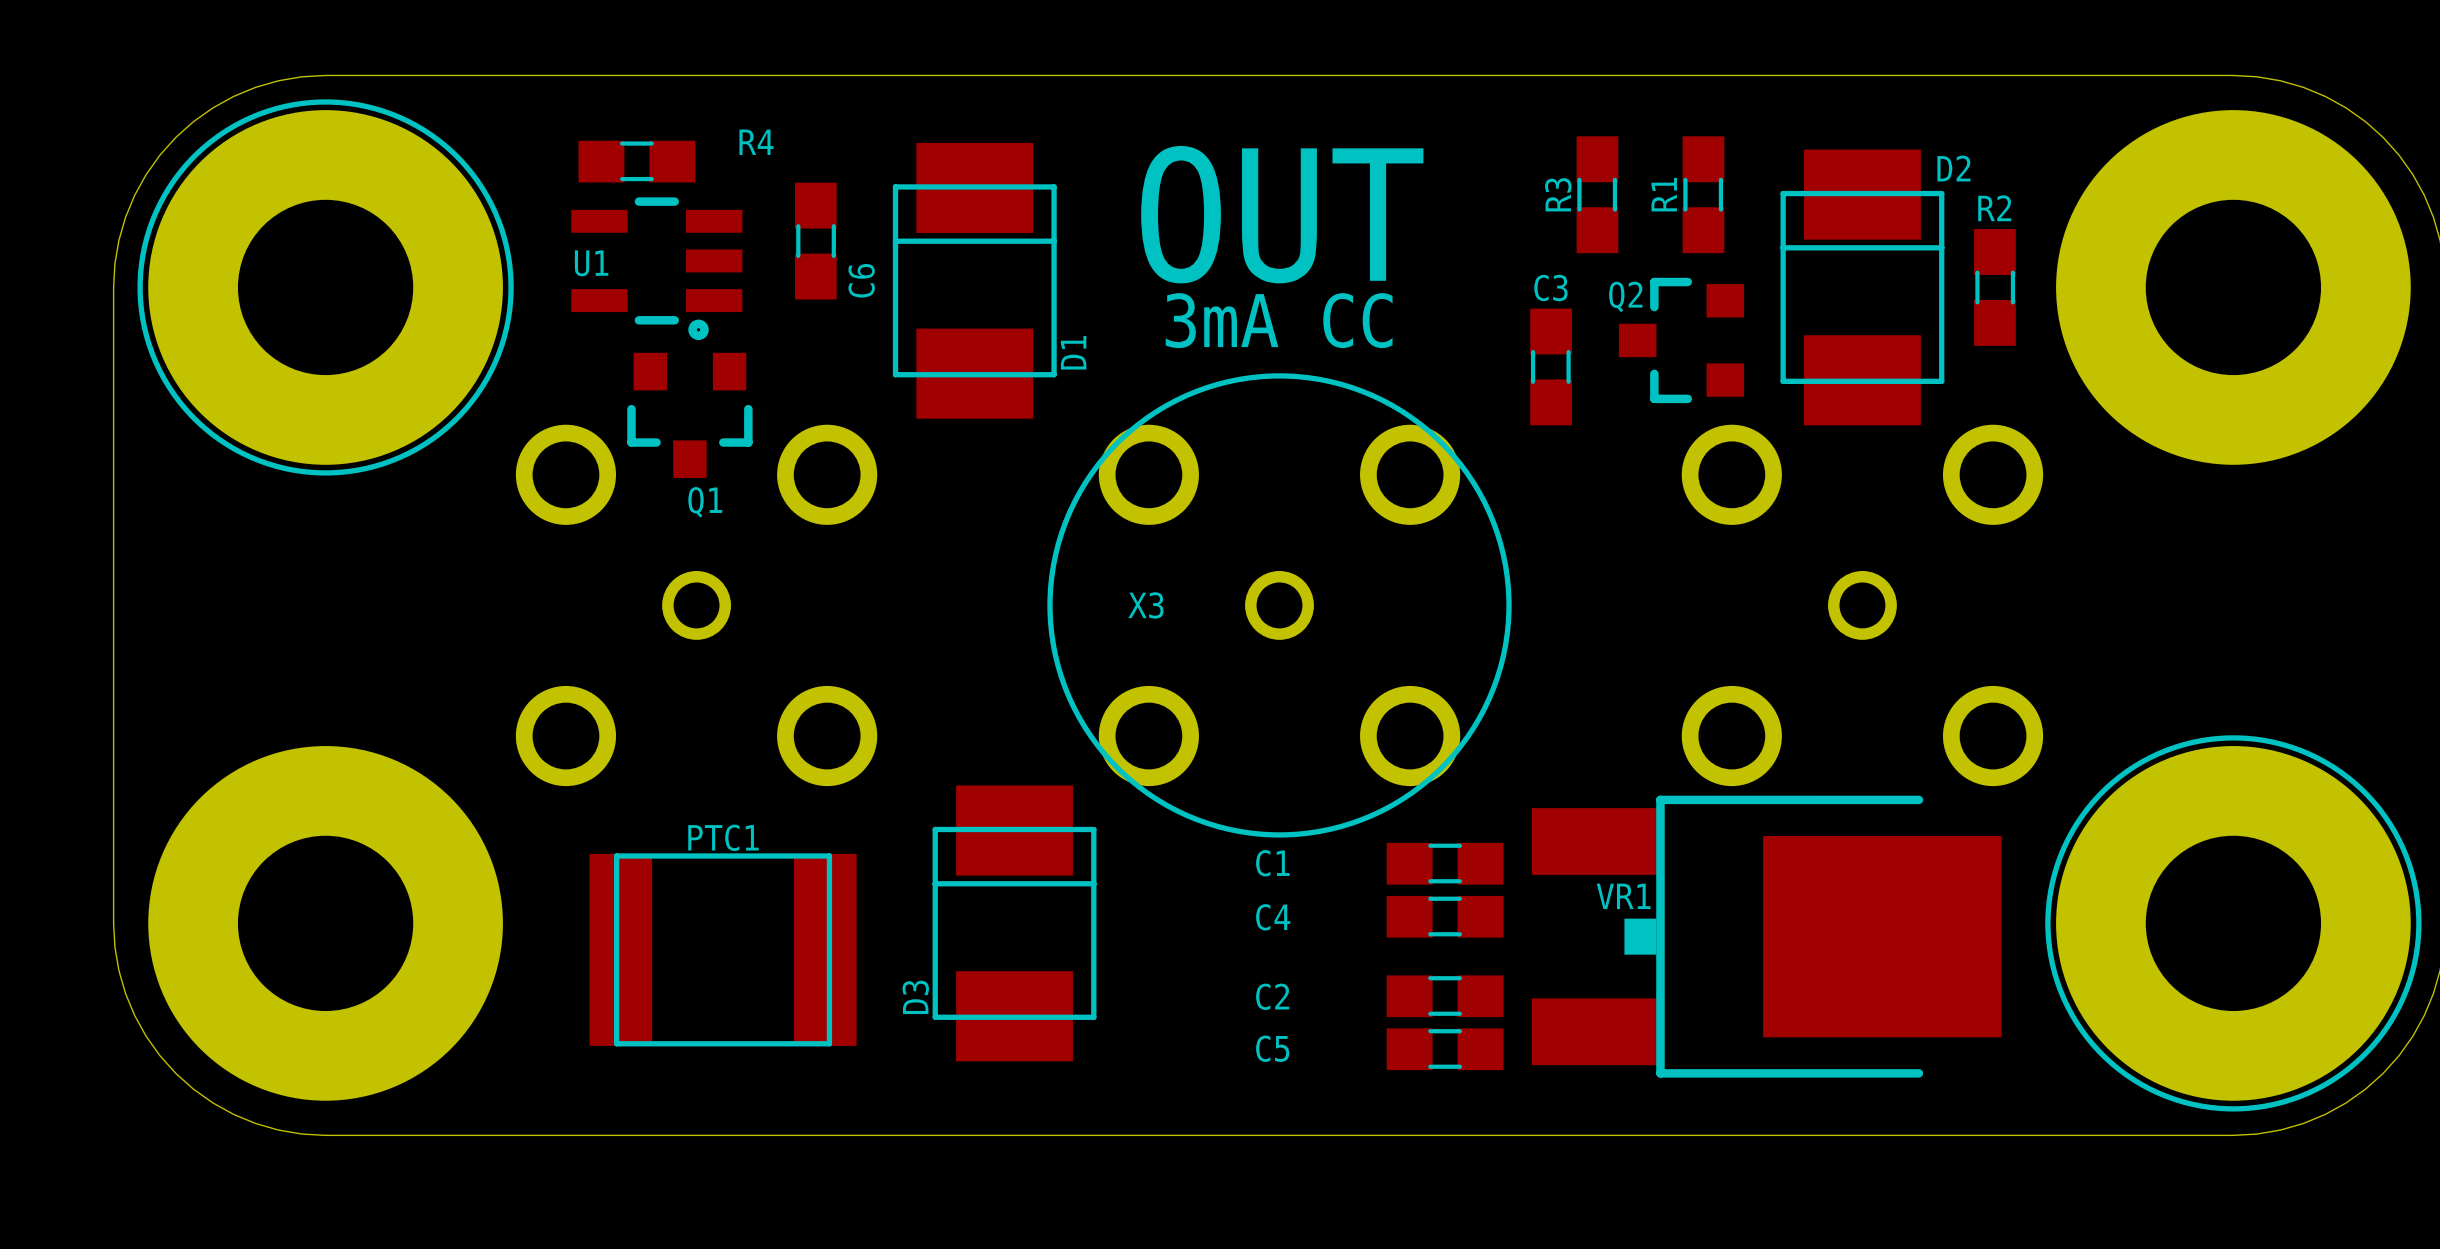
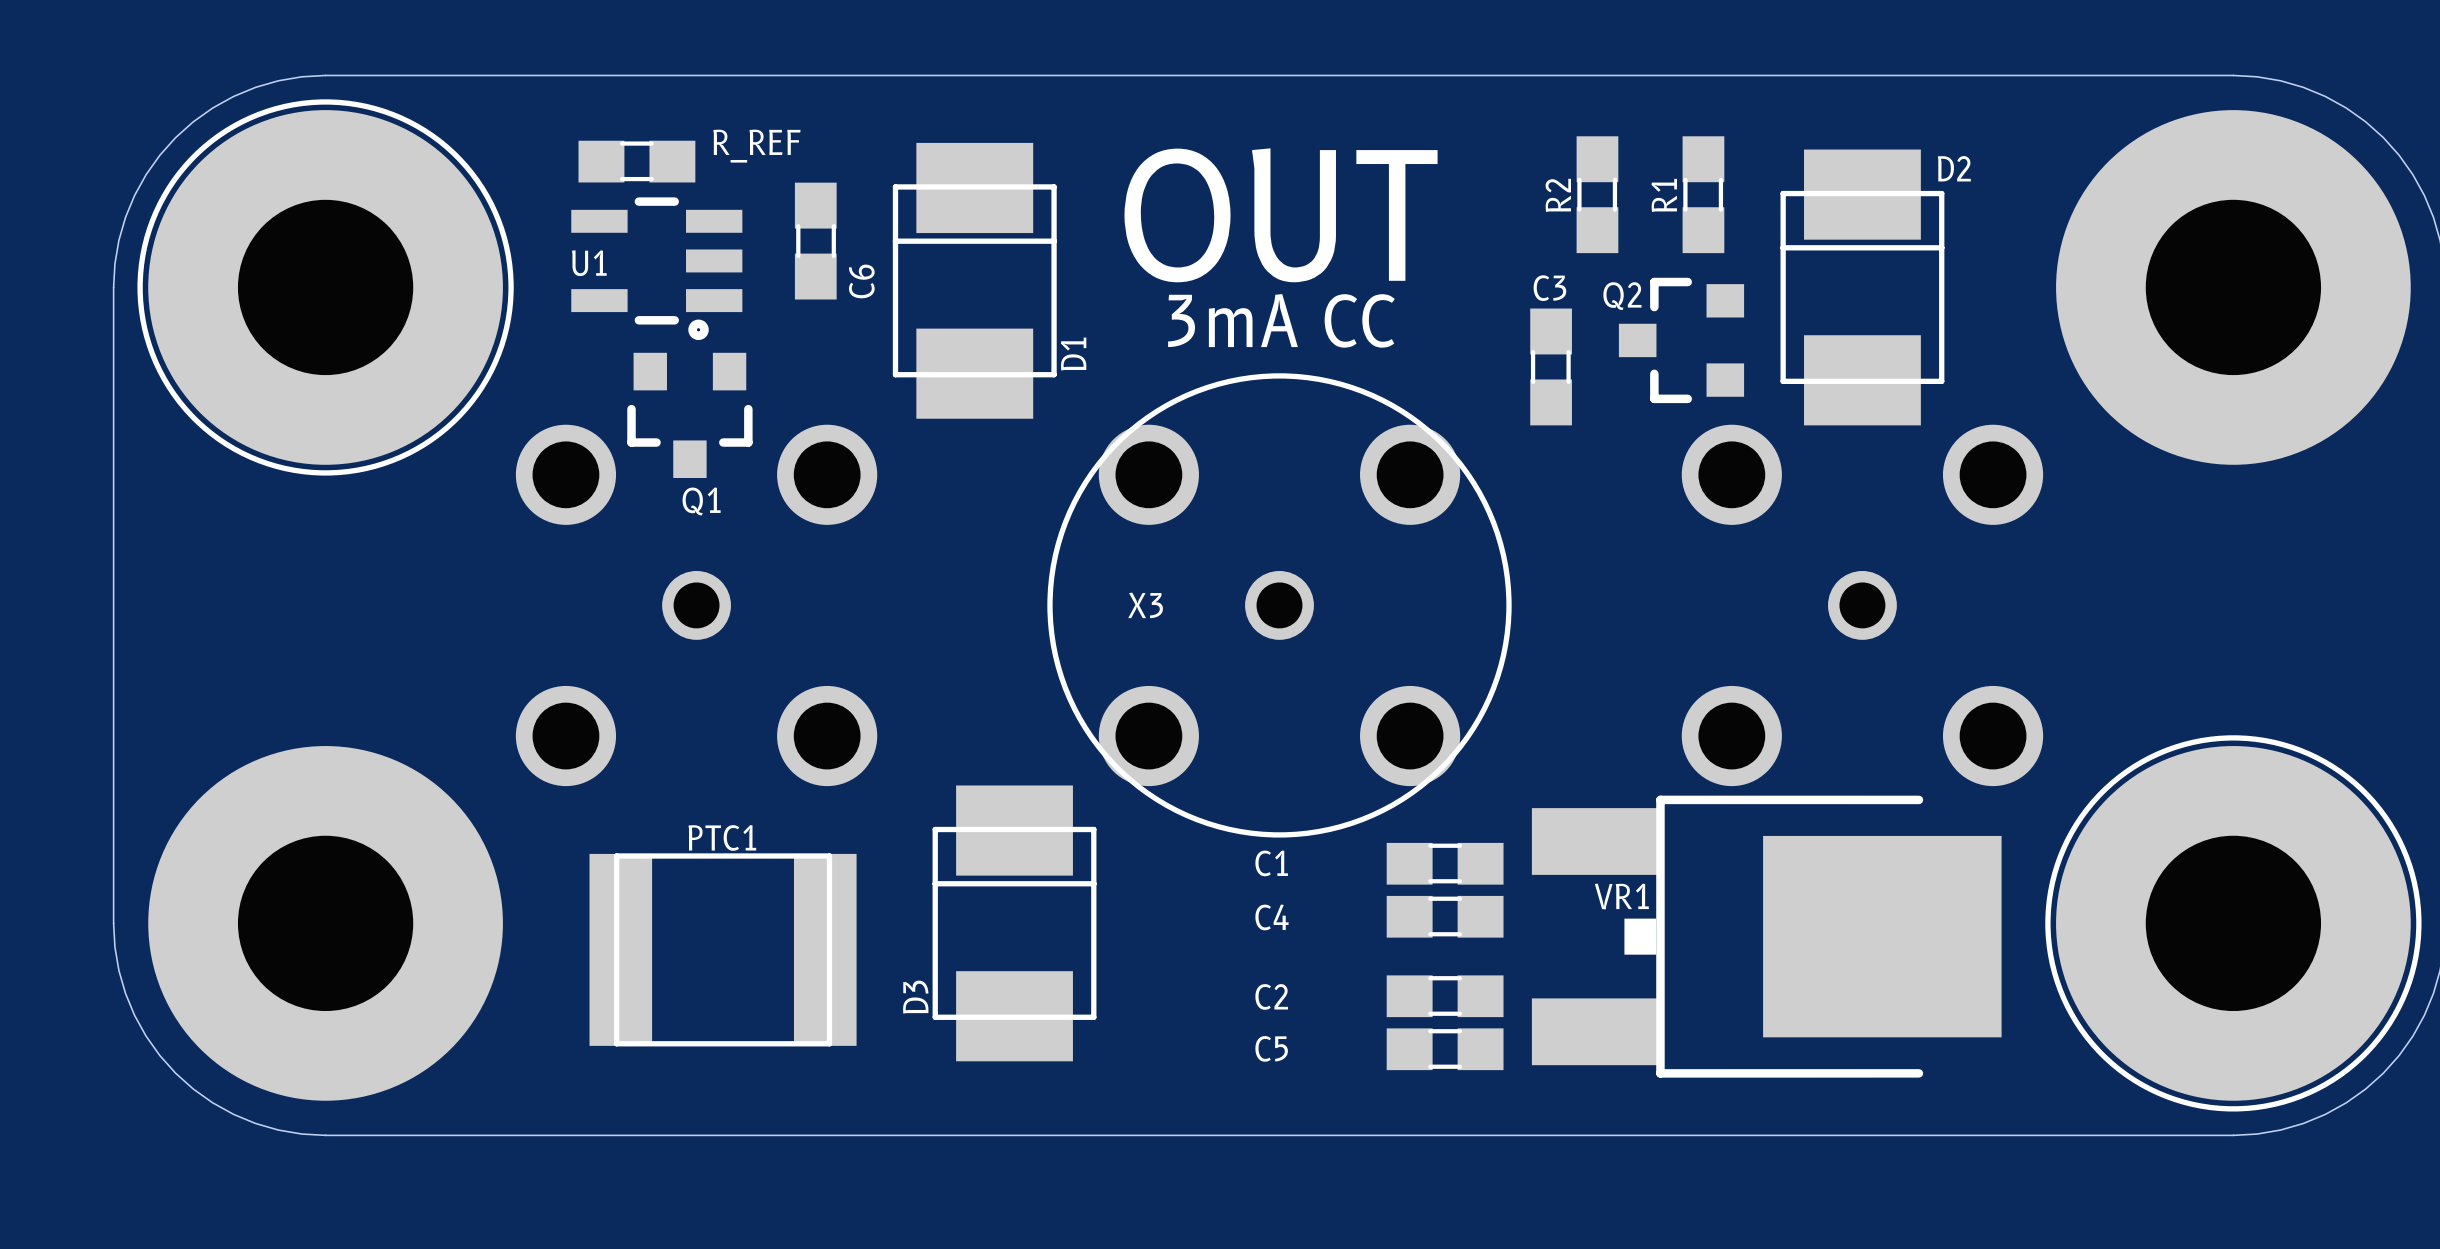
R4 name: R4 (756, 142) -> R_REF (756, 146)
R3 name: R3 (1558, 194) -> R2 (1558, 195)
R2: (1994, 287) -> none

